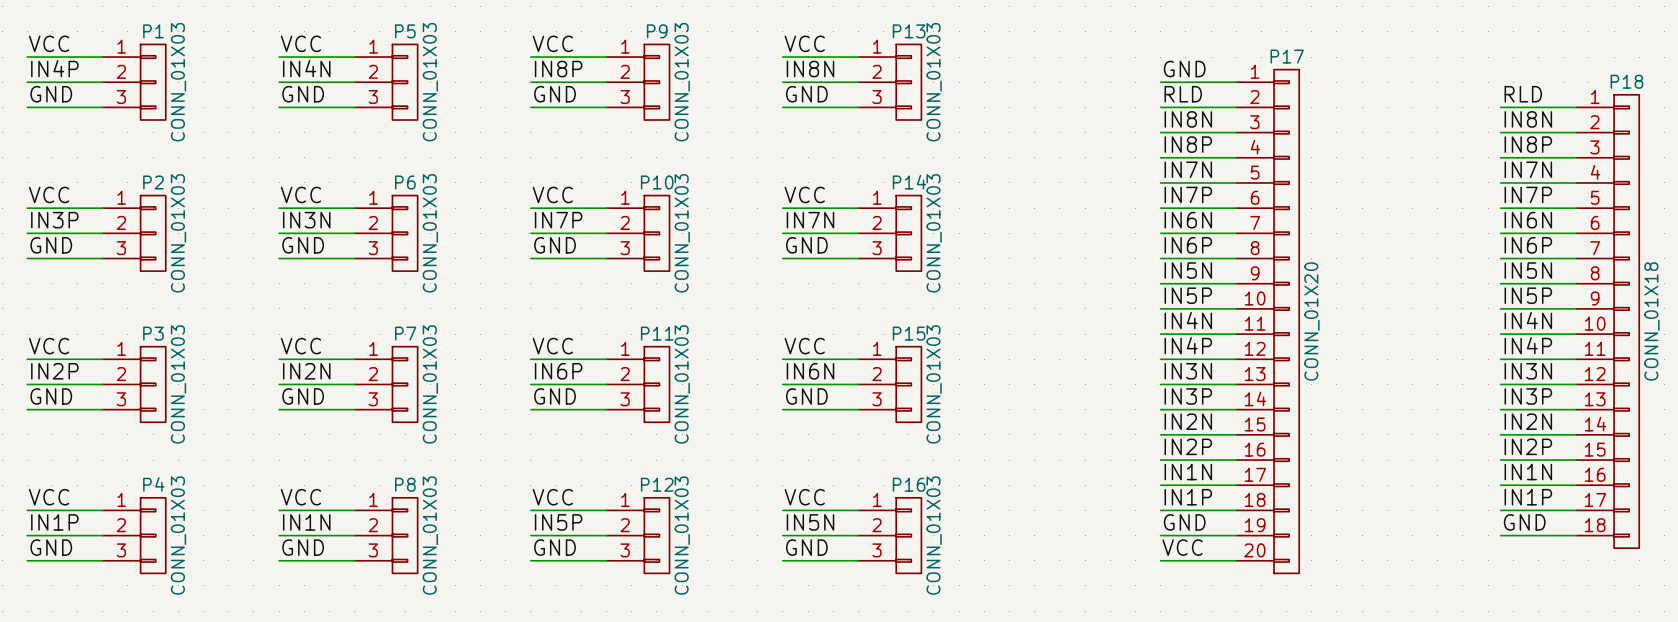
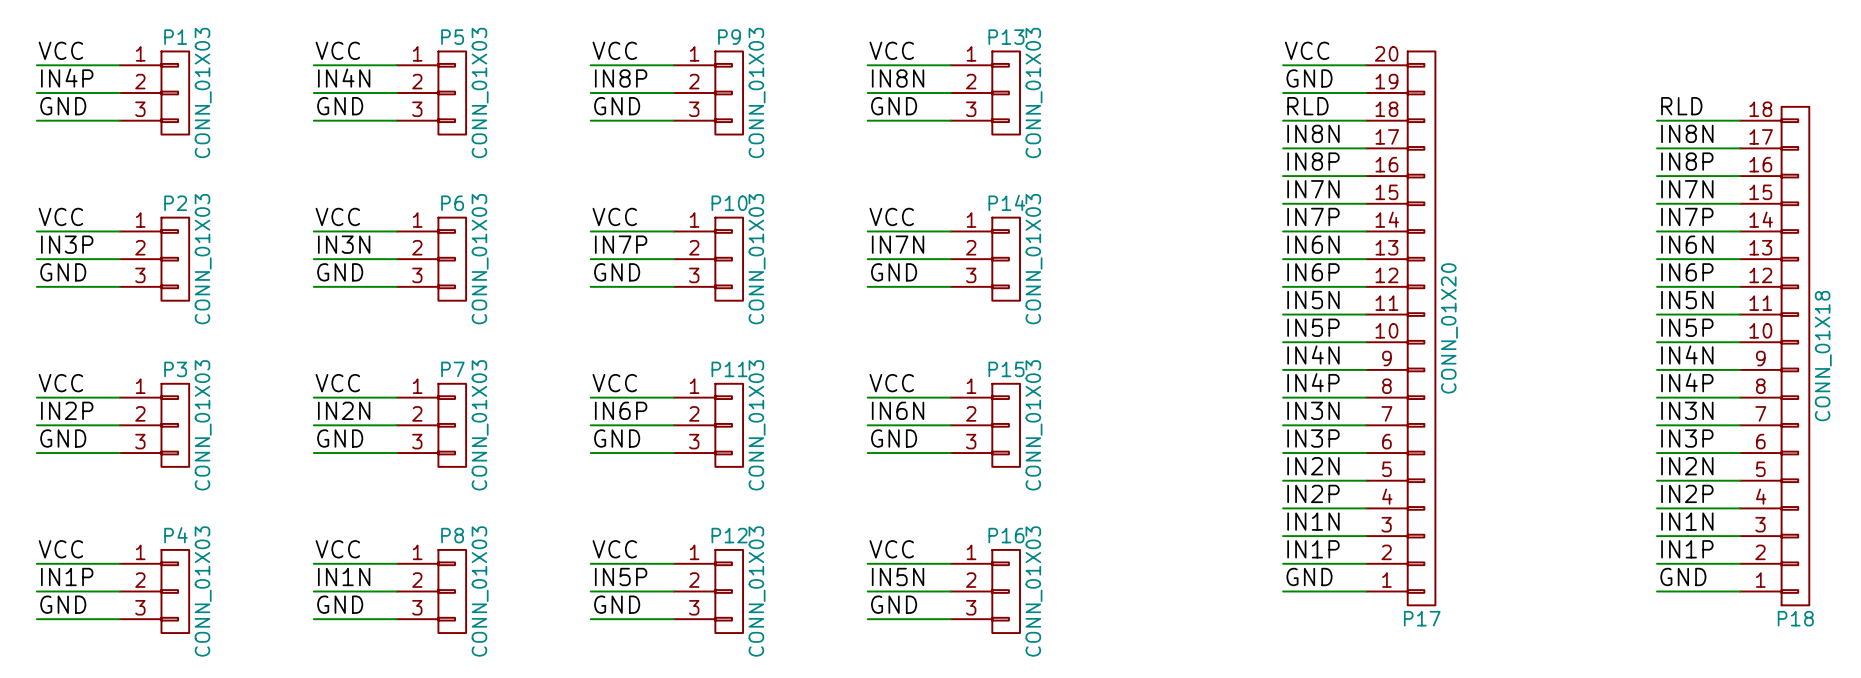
label: none -> VCC (1307, 50)
wire: none -> (1283, 65) (1366, 65)
P17 flip: as is (1286, 321) -> up-down (1421, 328)
P18 flip: as is (1626, 321) -> up-down (1795, 356)
label: VCC (1182, 547) -> none
wire: (1160, 560) (1236, 560) -> none

